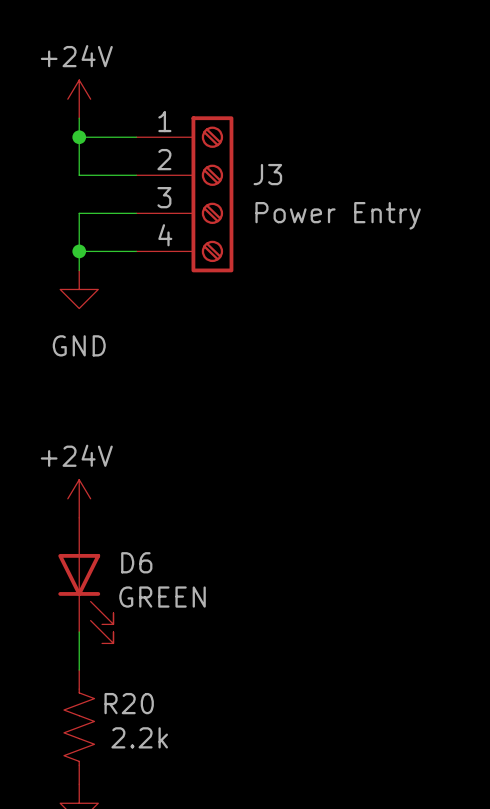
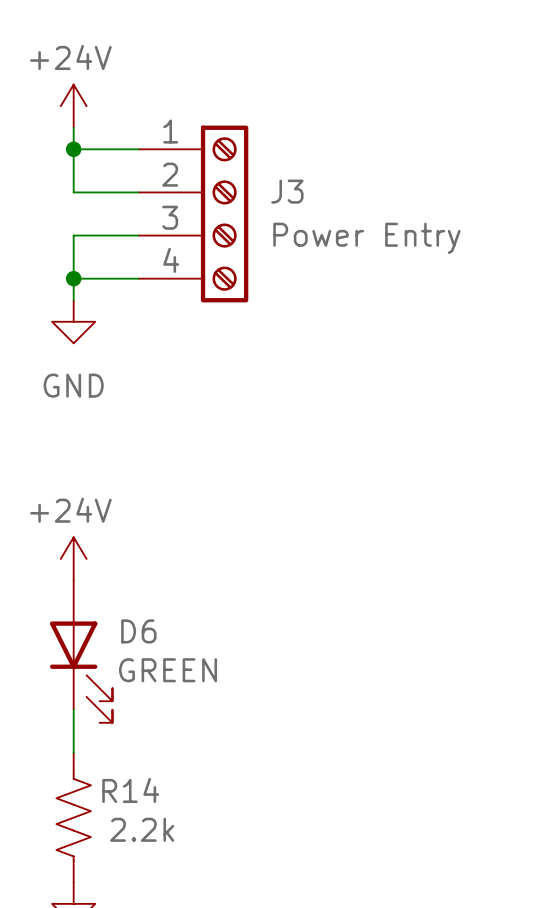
R20 name: R20 (129, 703) -> R14 (130, 790)

